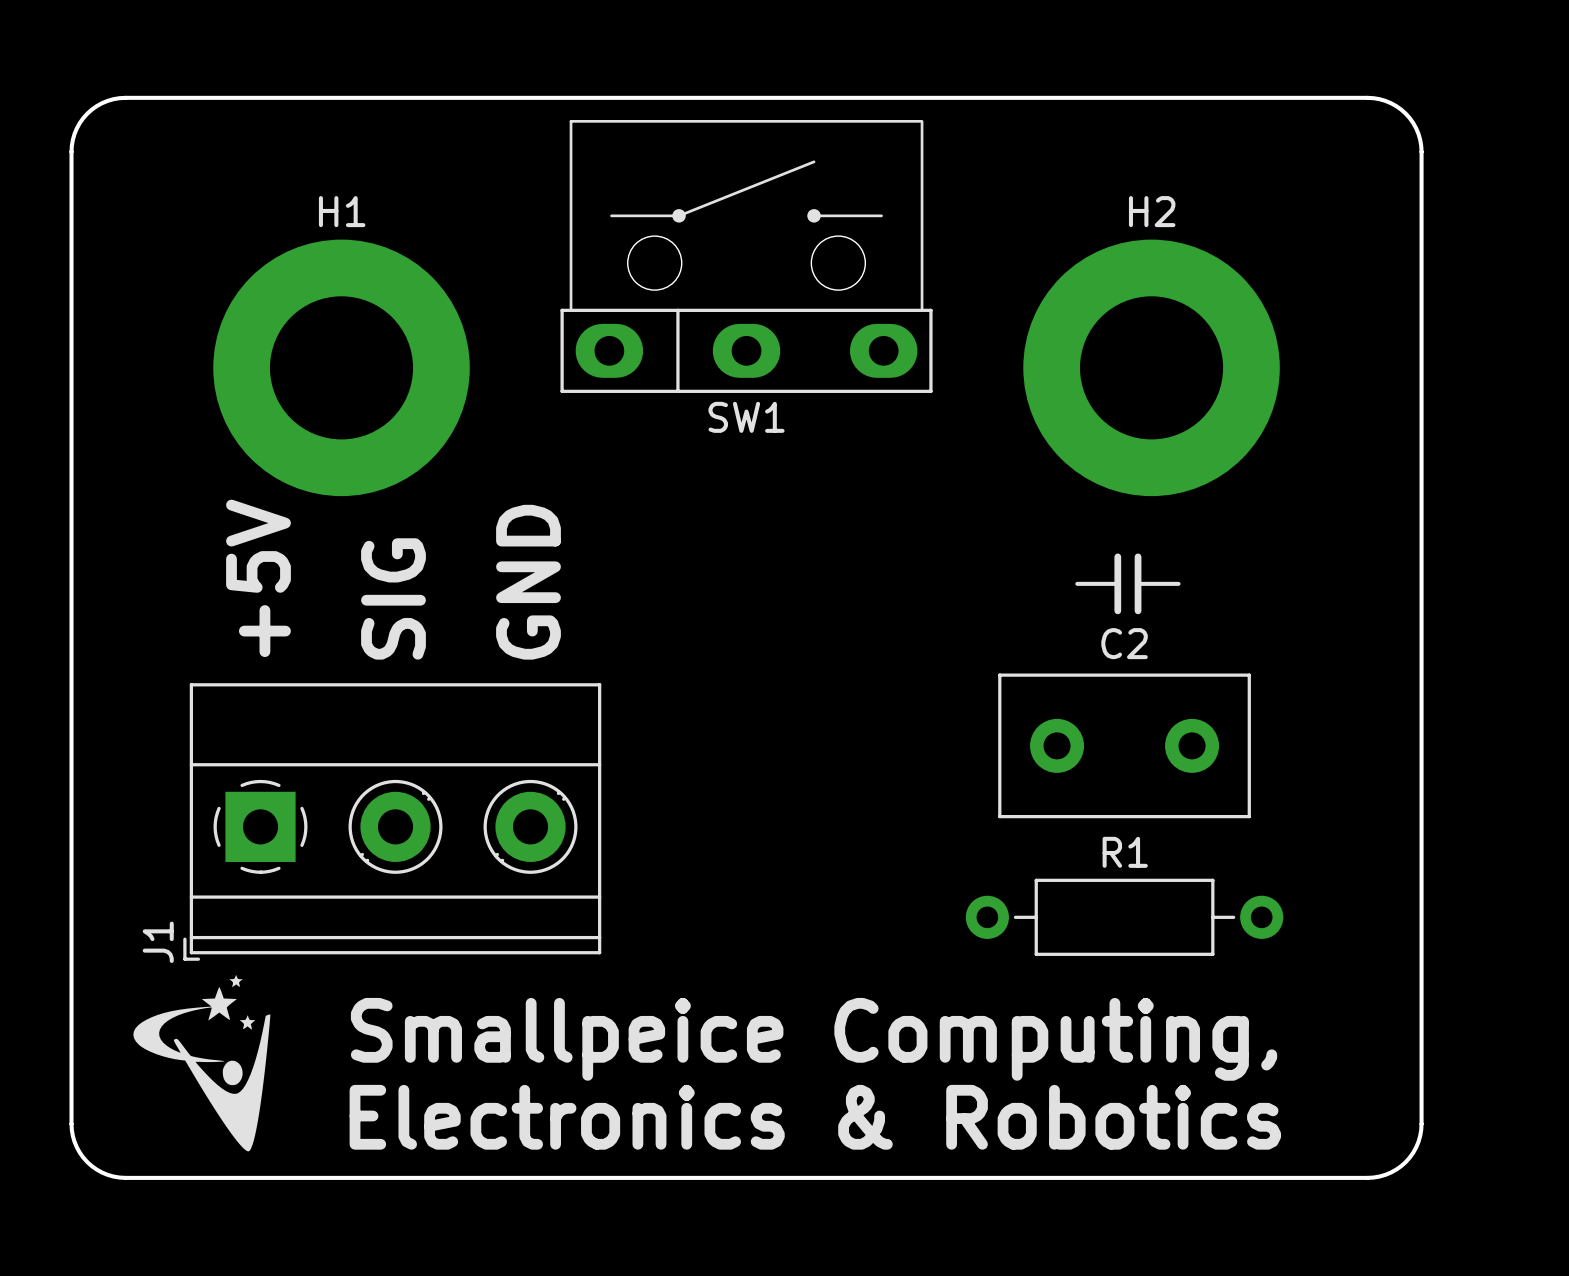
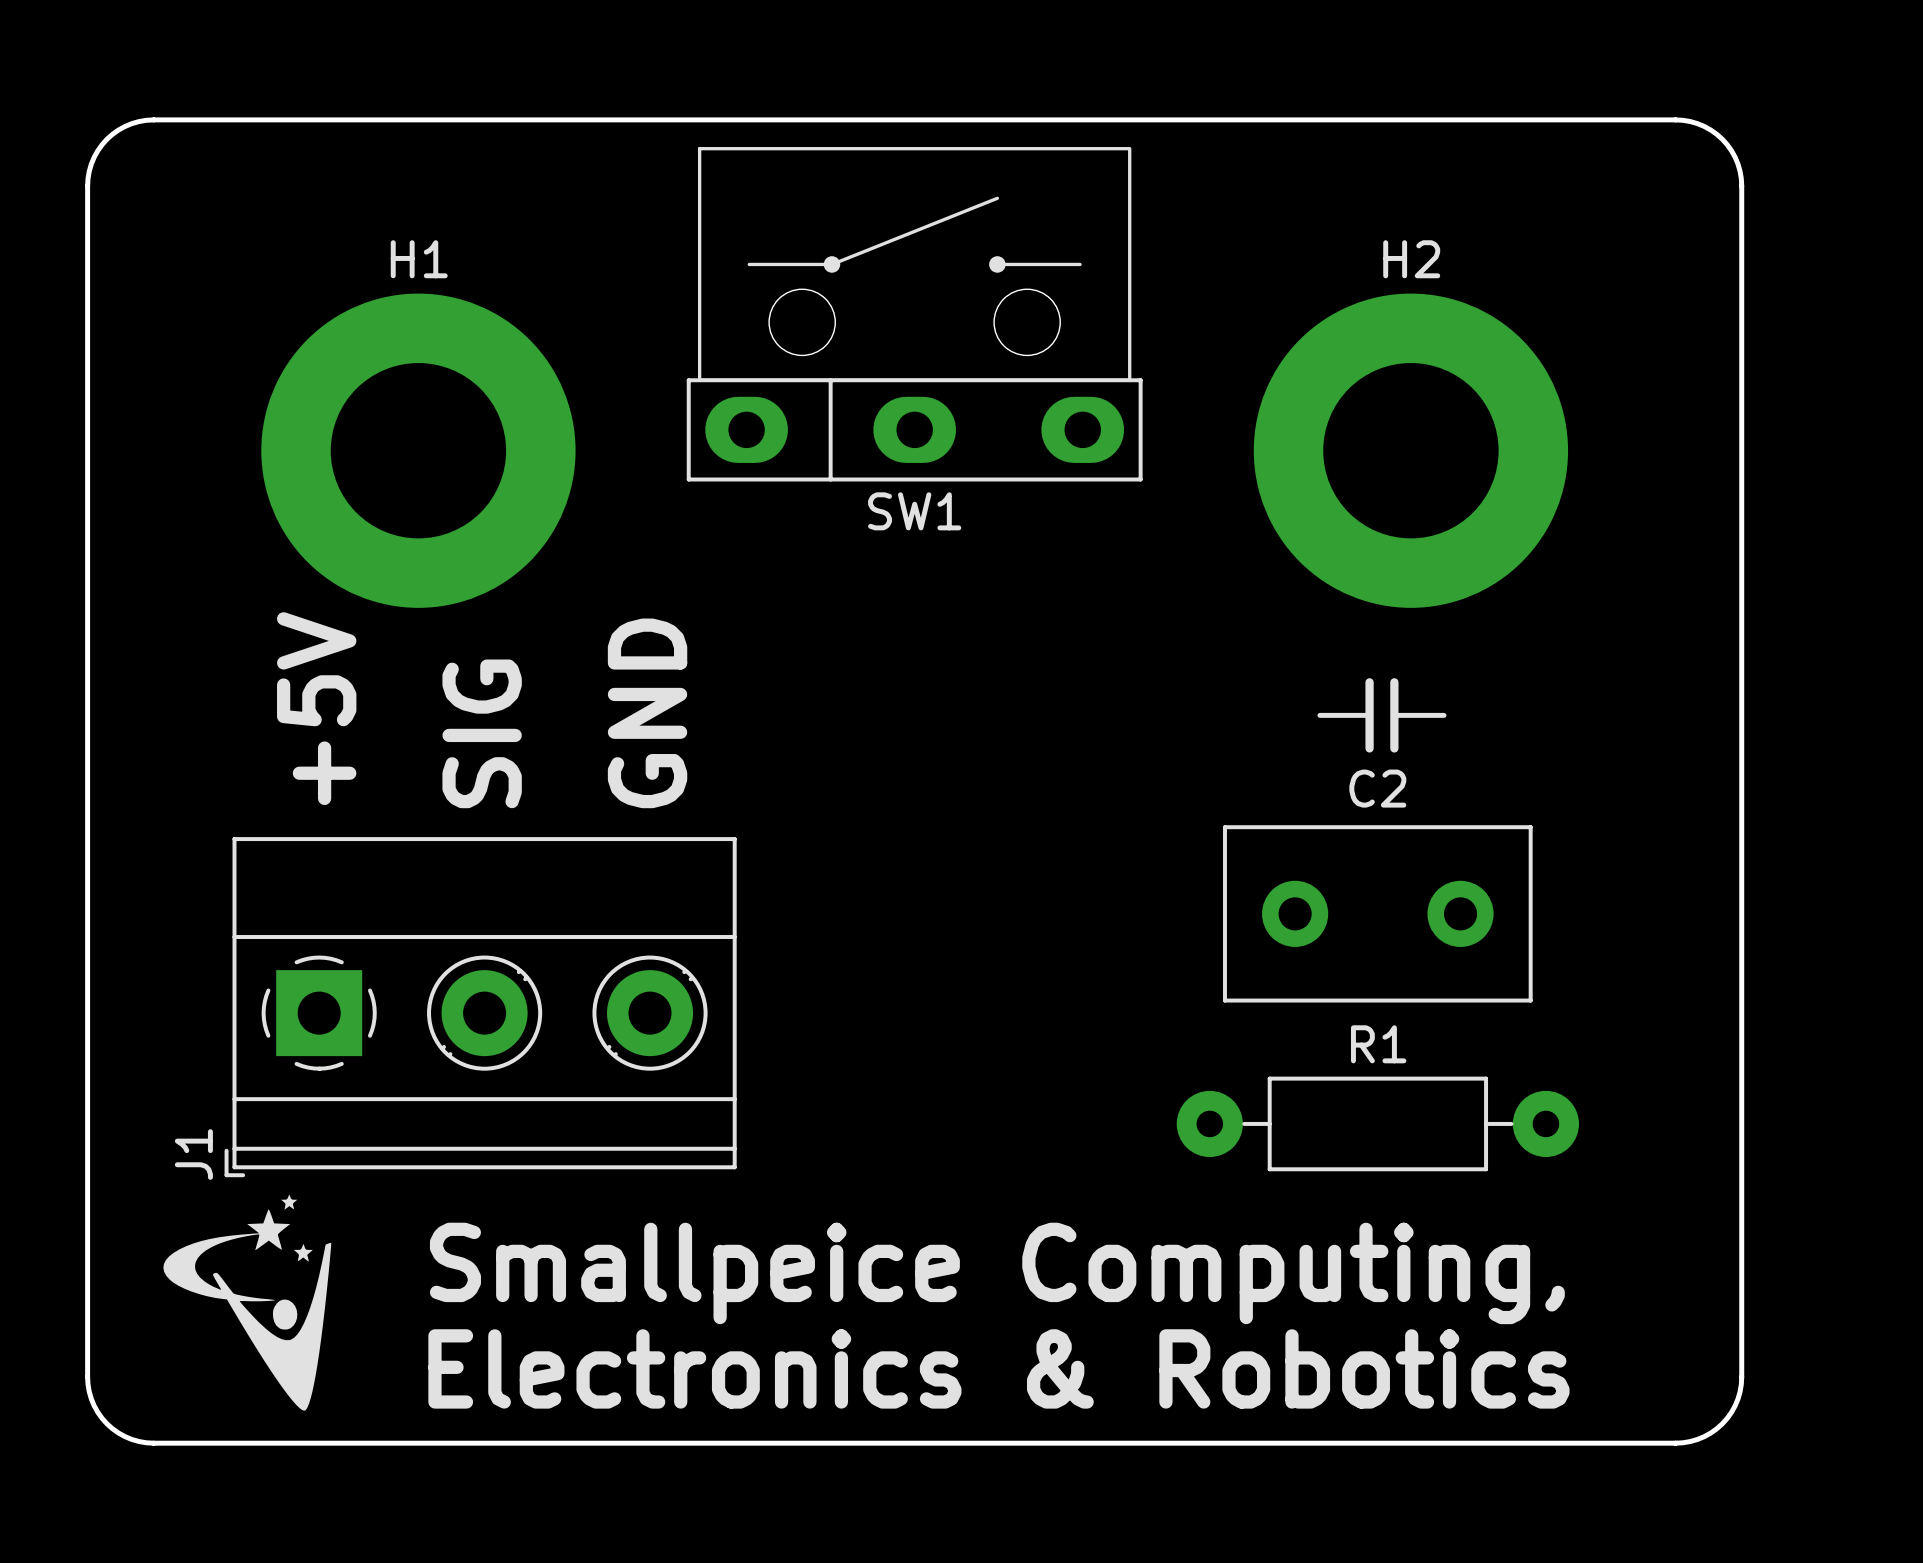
R1 footprint: [965, 878, 1284, 956] -> [1176, 1076, 1580, 1172]

